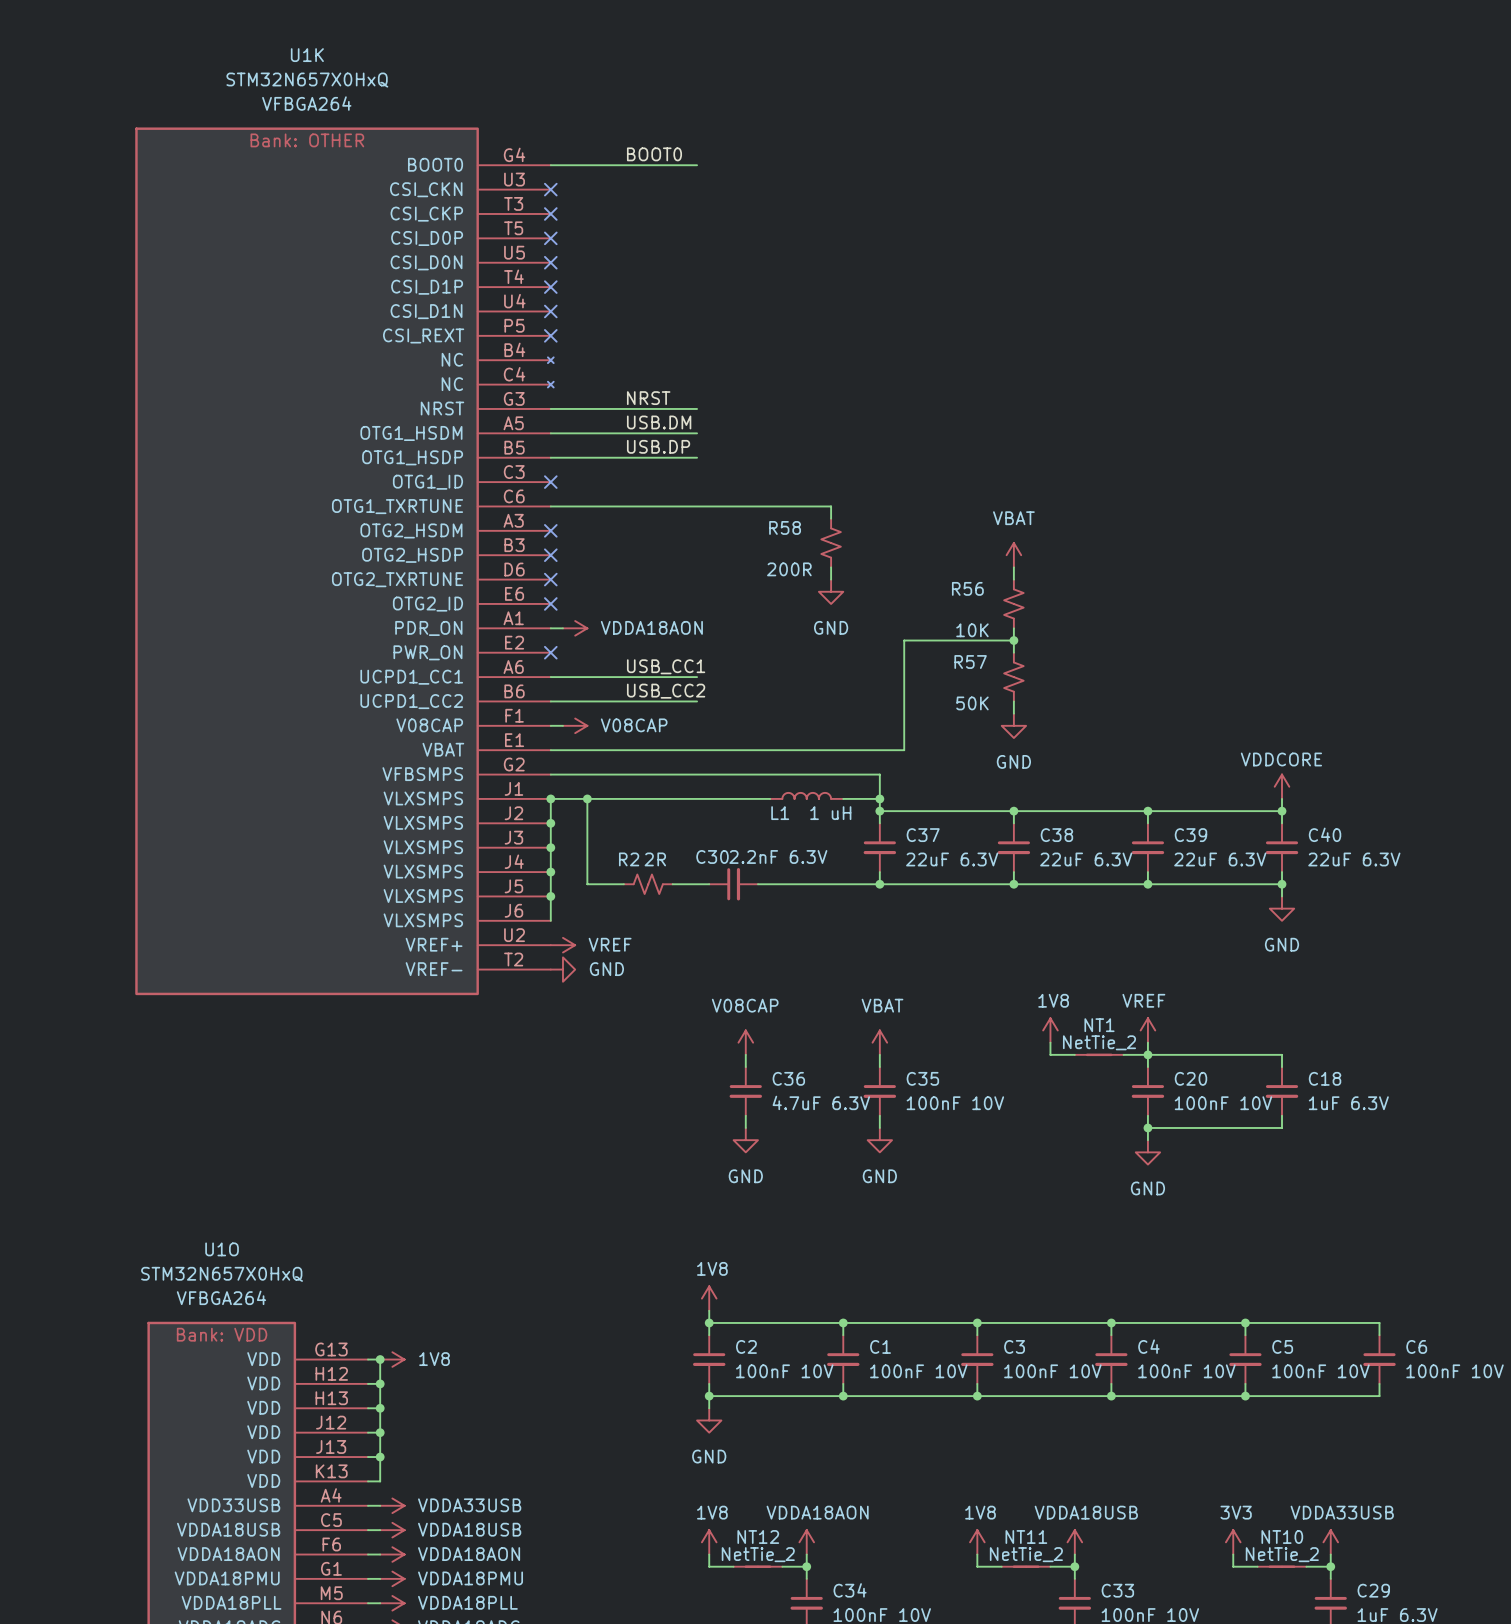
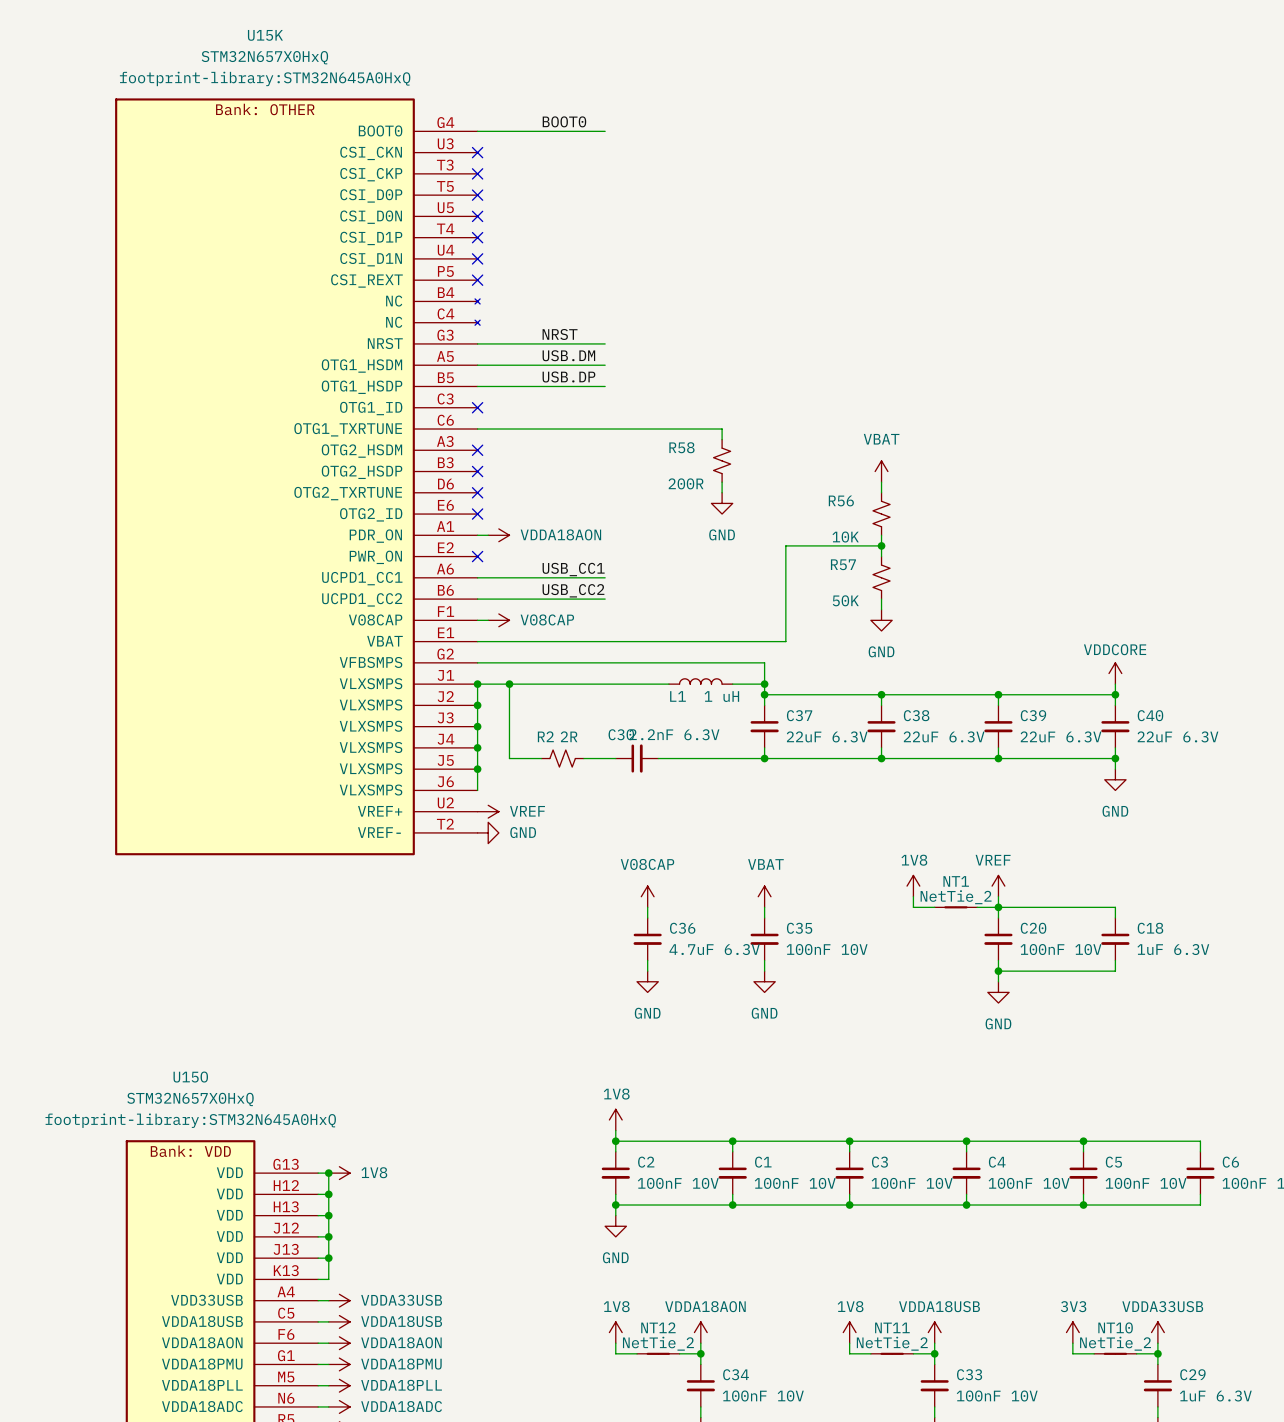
U1K name: U1K (307, 55) -> U15K (265, 35)
U1K text: VFBGA264 (306, 103) -> footprint-library:STM32N645A0HxQ (265, 78)
U1O name: U1O (222, 1249) -> U15O (190, 1077)
U1O text: VFBGA264 (221, 1297) -> footprint-library:STM32N645A0HxQ (190, 1120)

